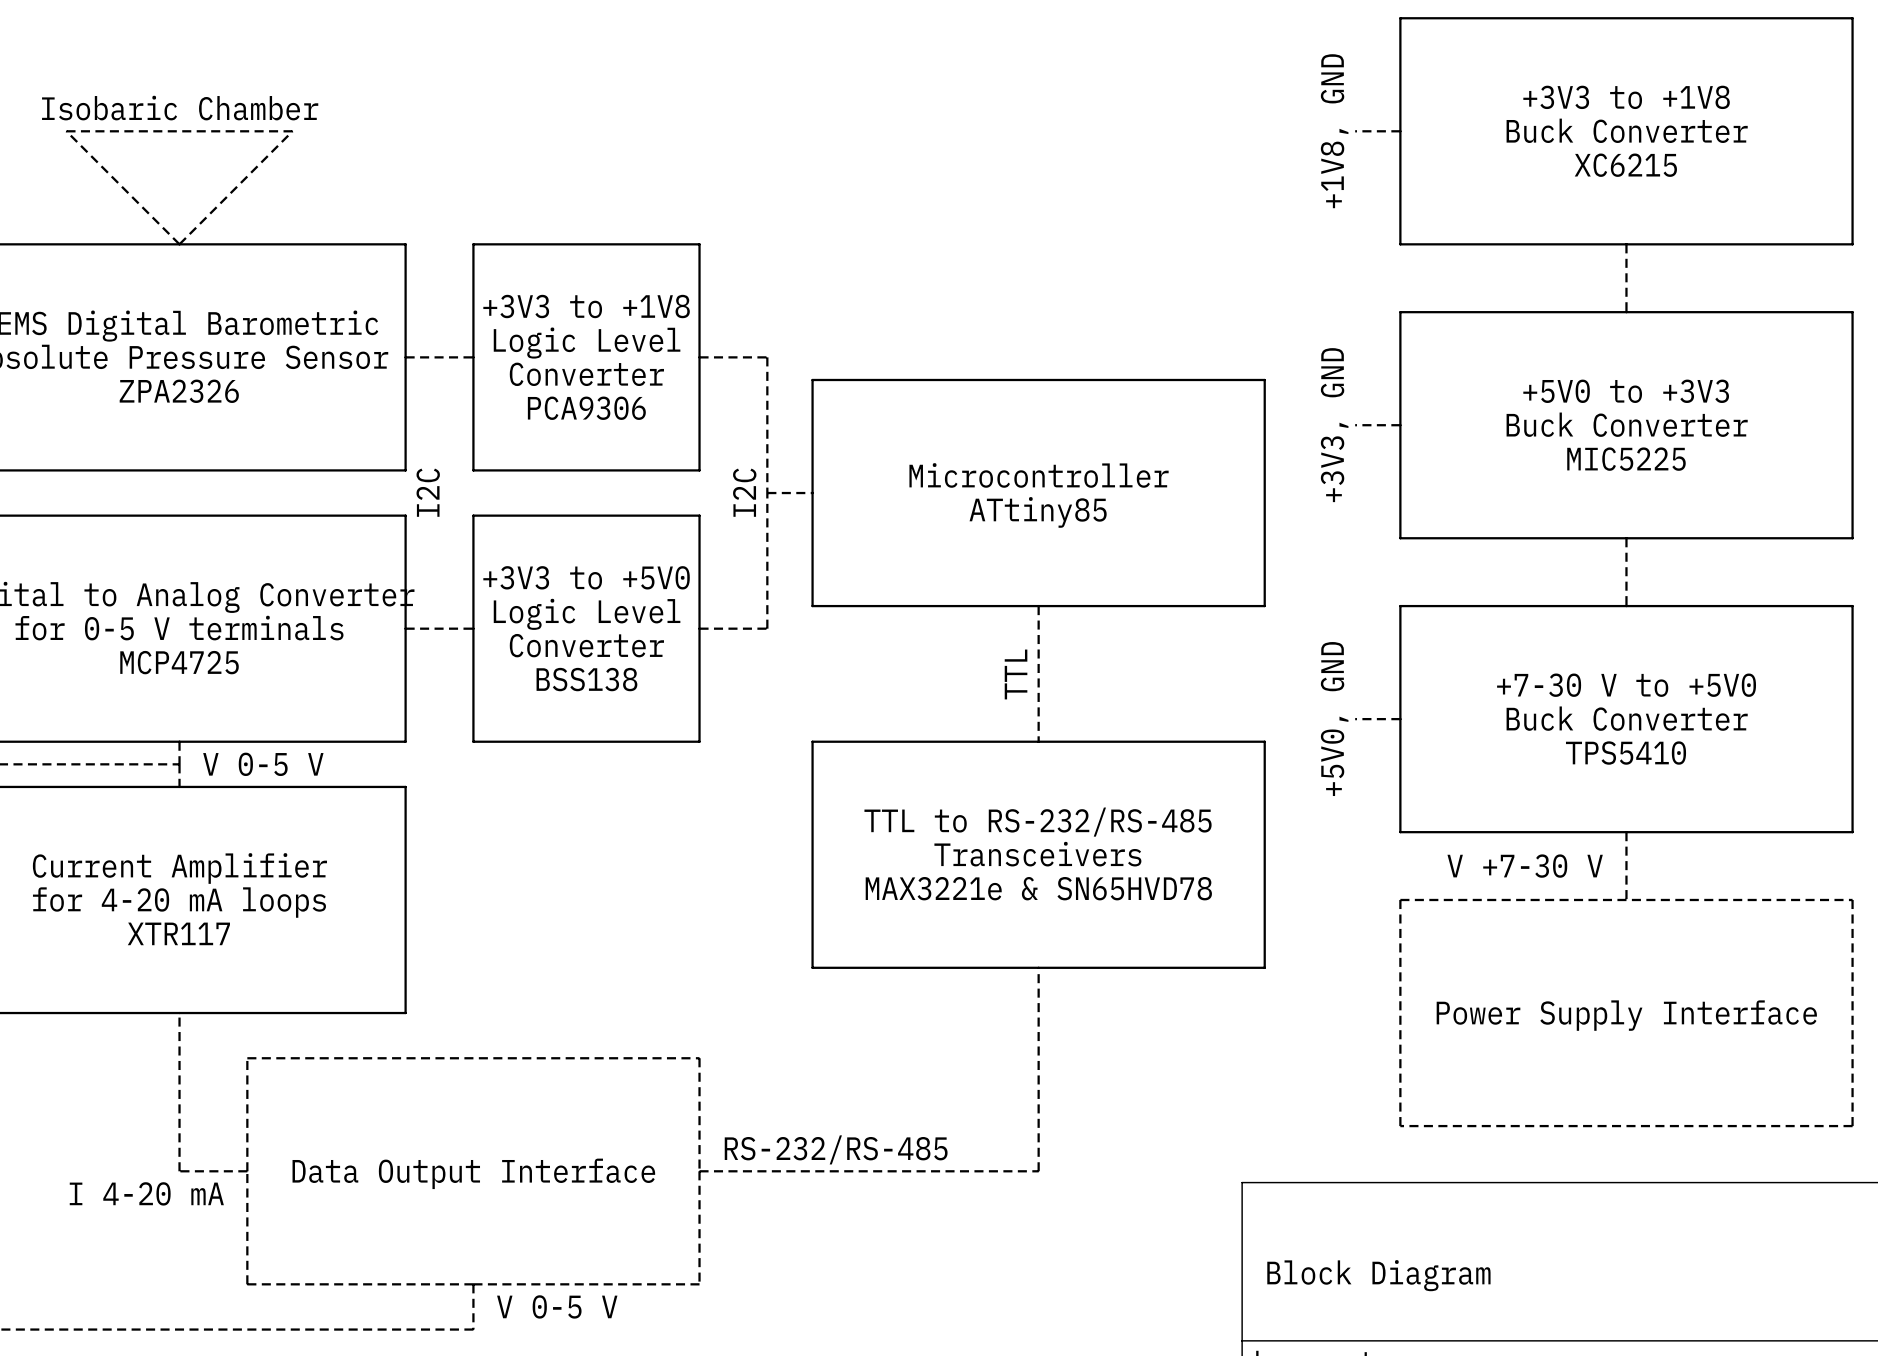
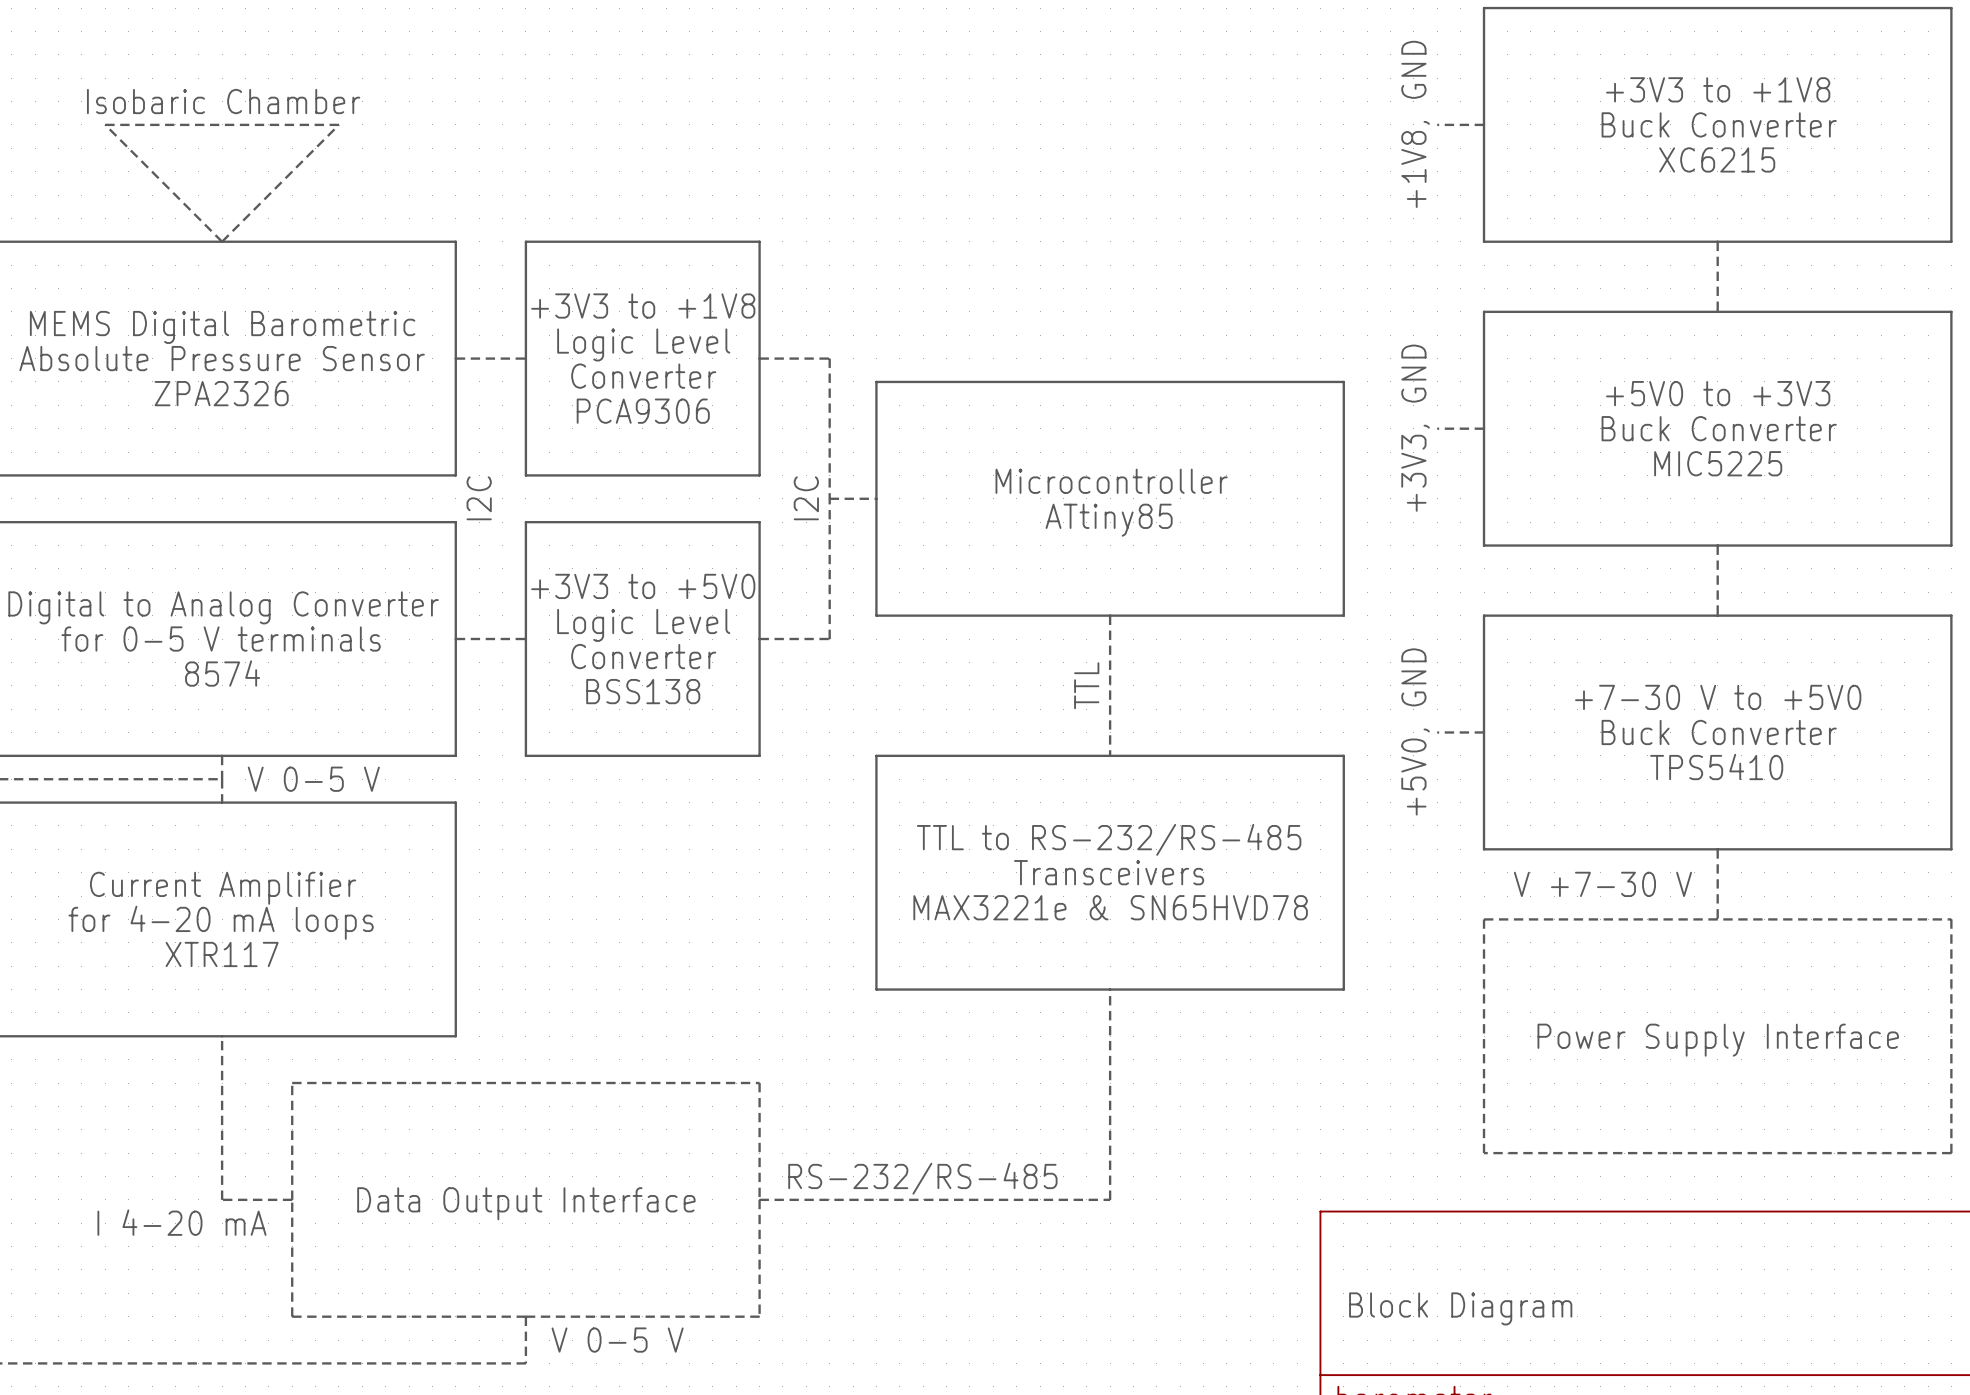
text: MCP4725 (179, 662) -> 8574 (222, 673)

